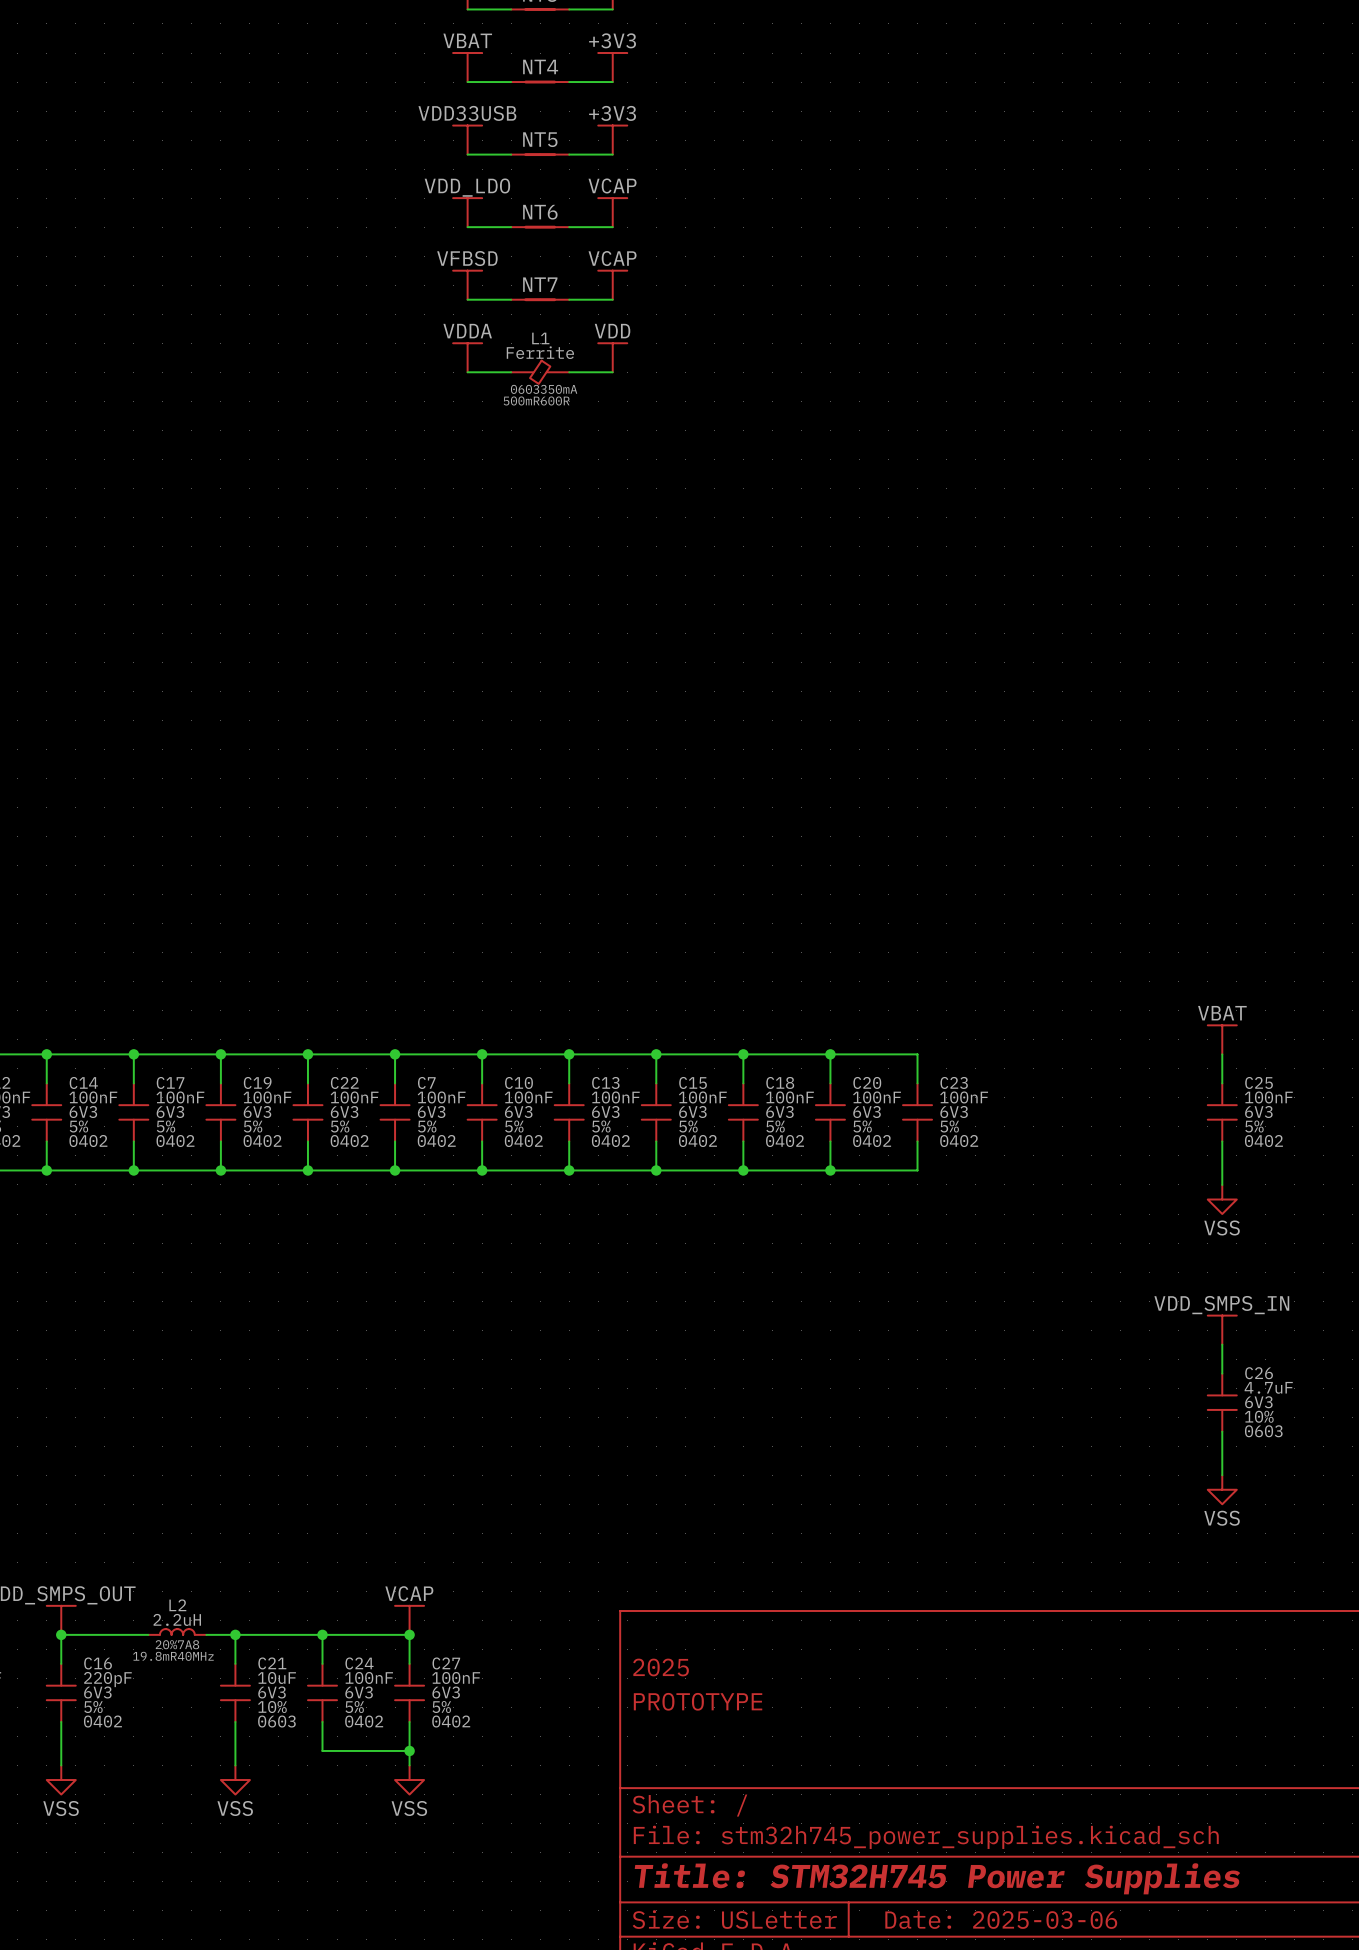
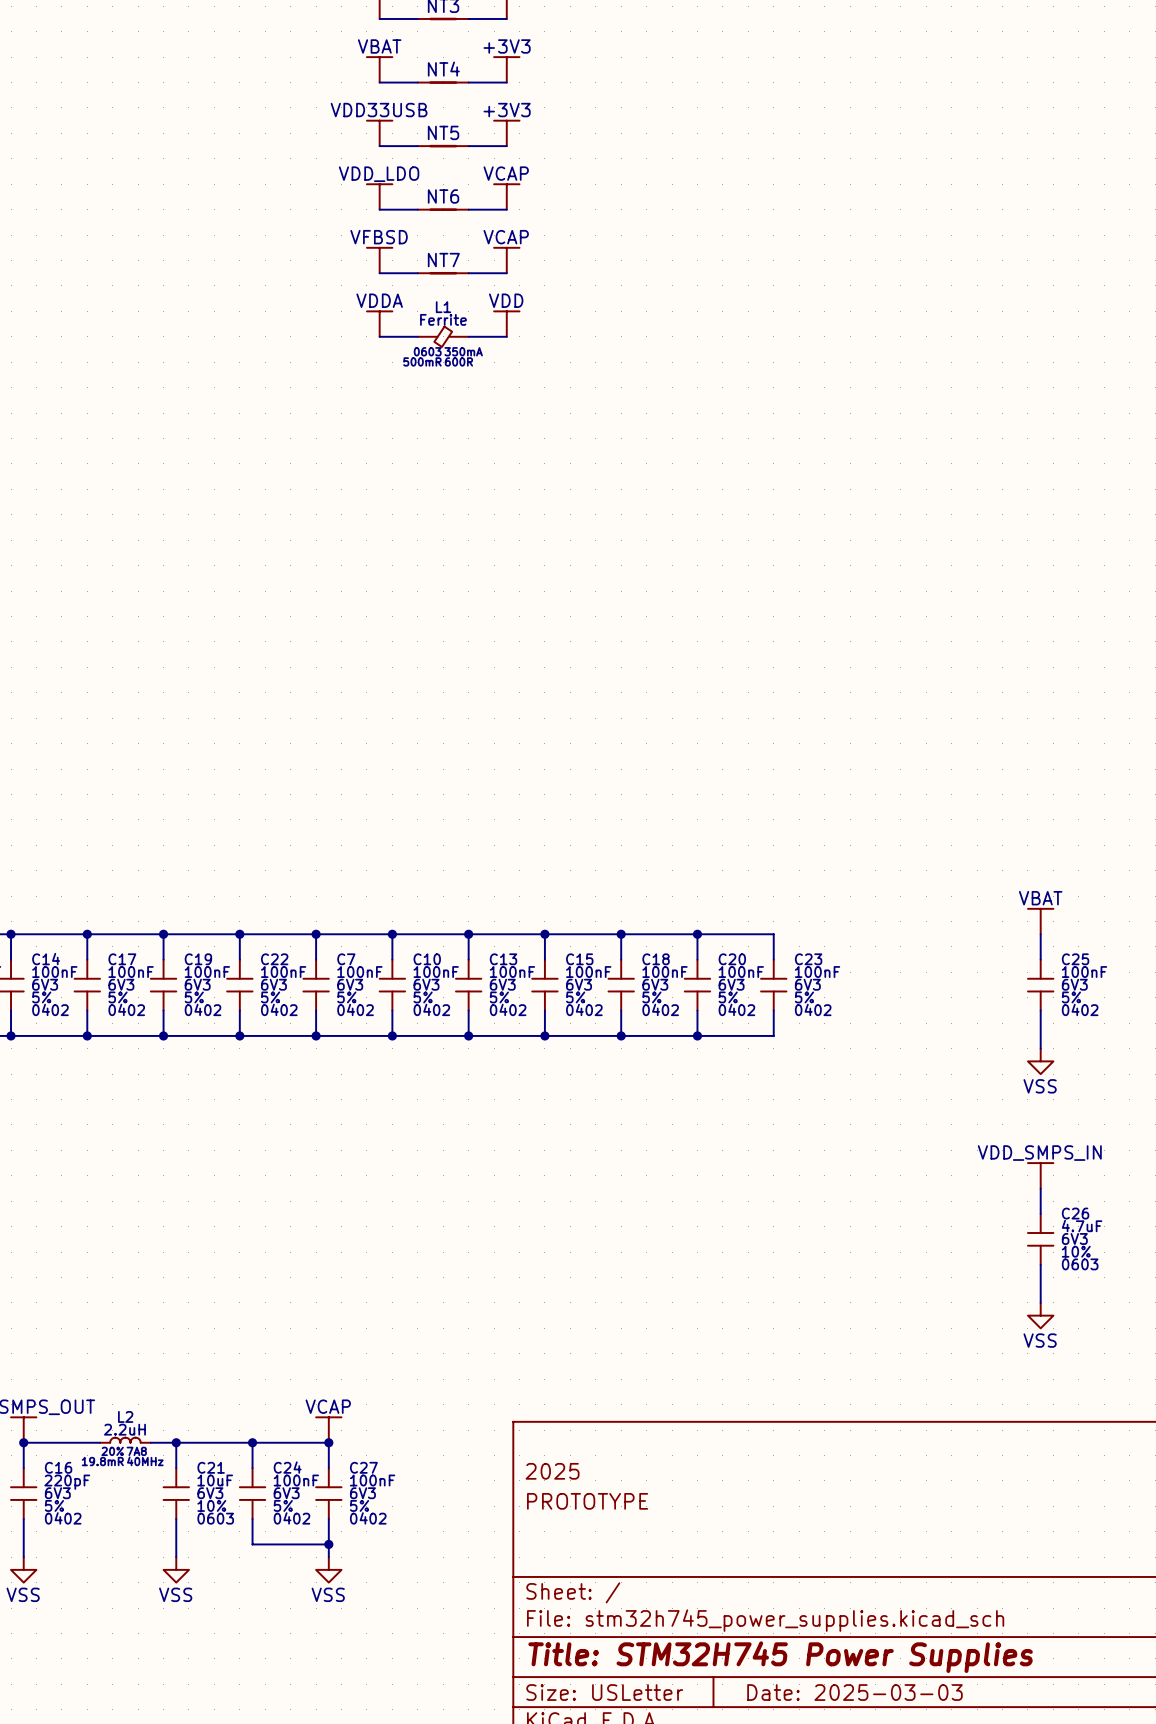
title block: Date: 2025-03-06 (1001, 1920) -> Date: 2025-03-03 (854, 1692)

